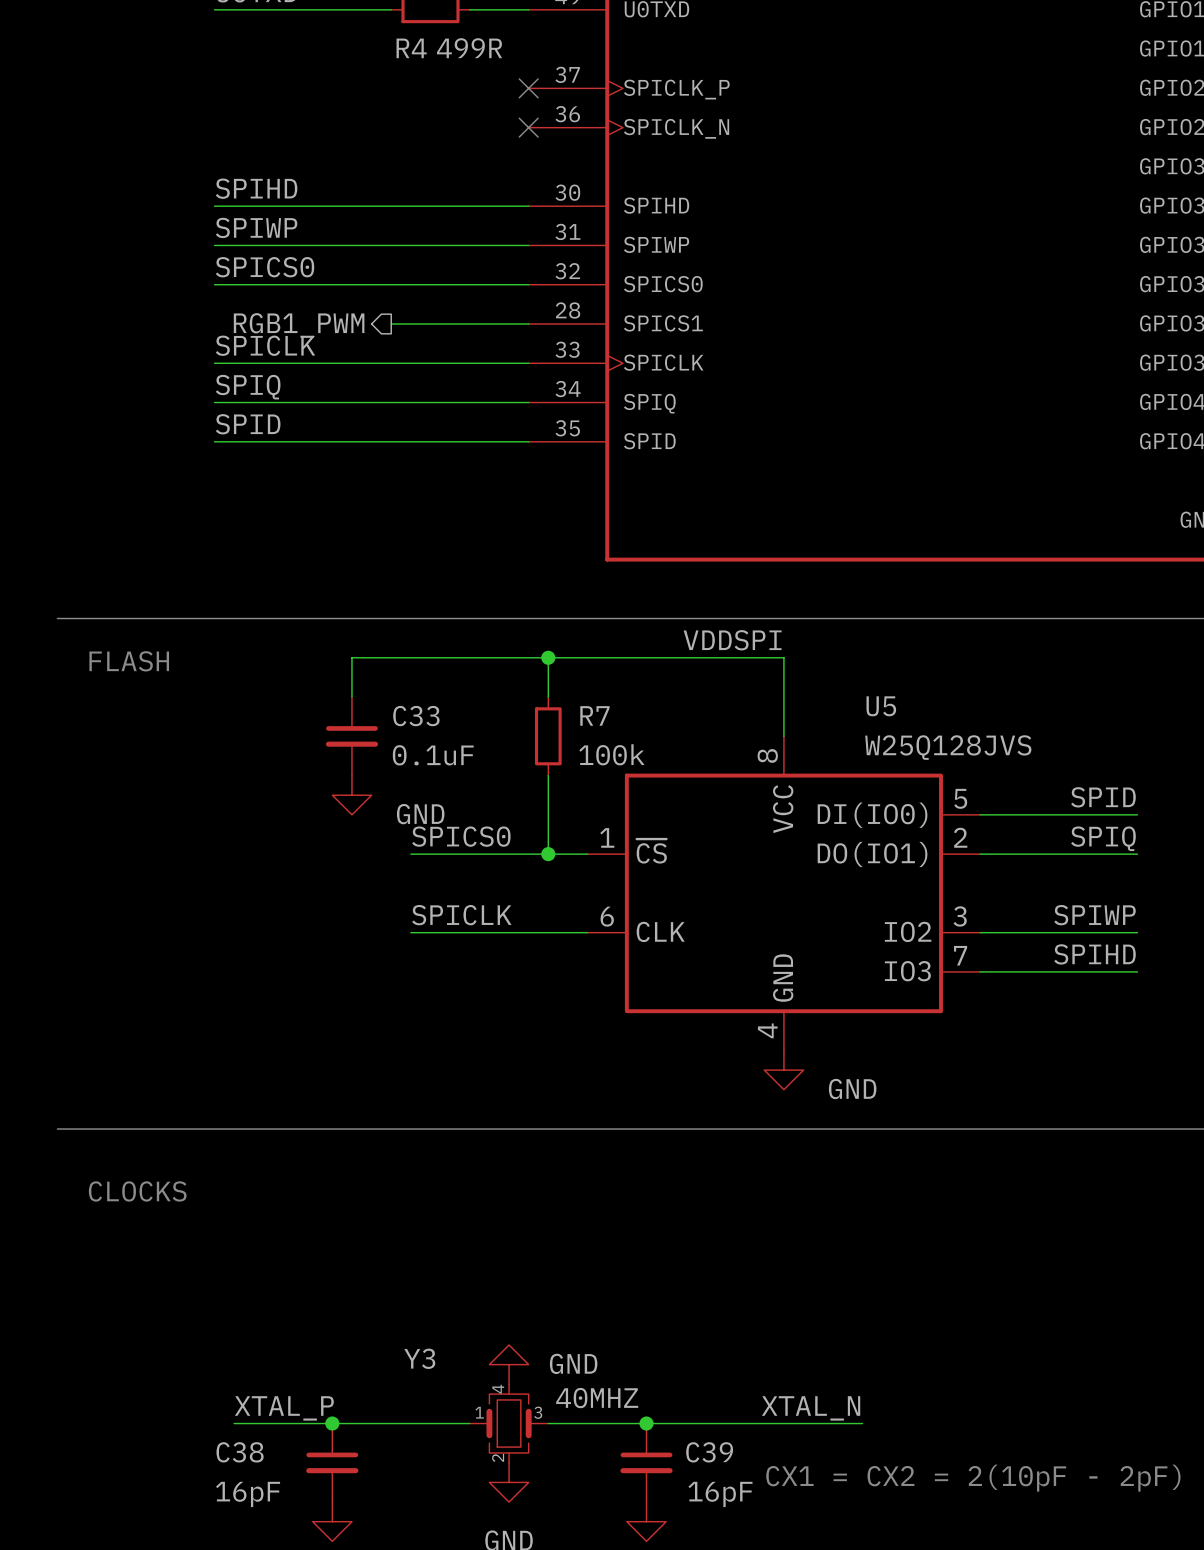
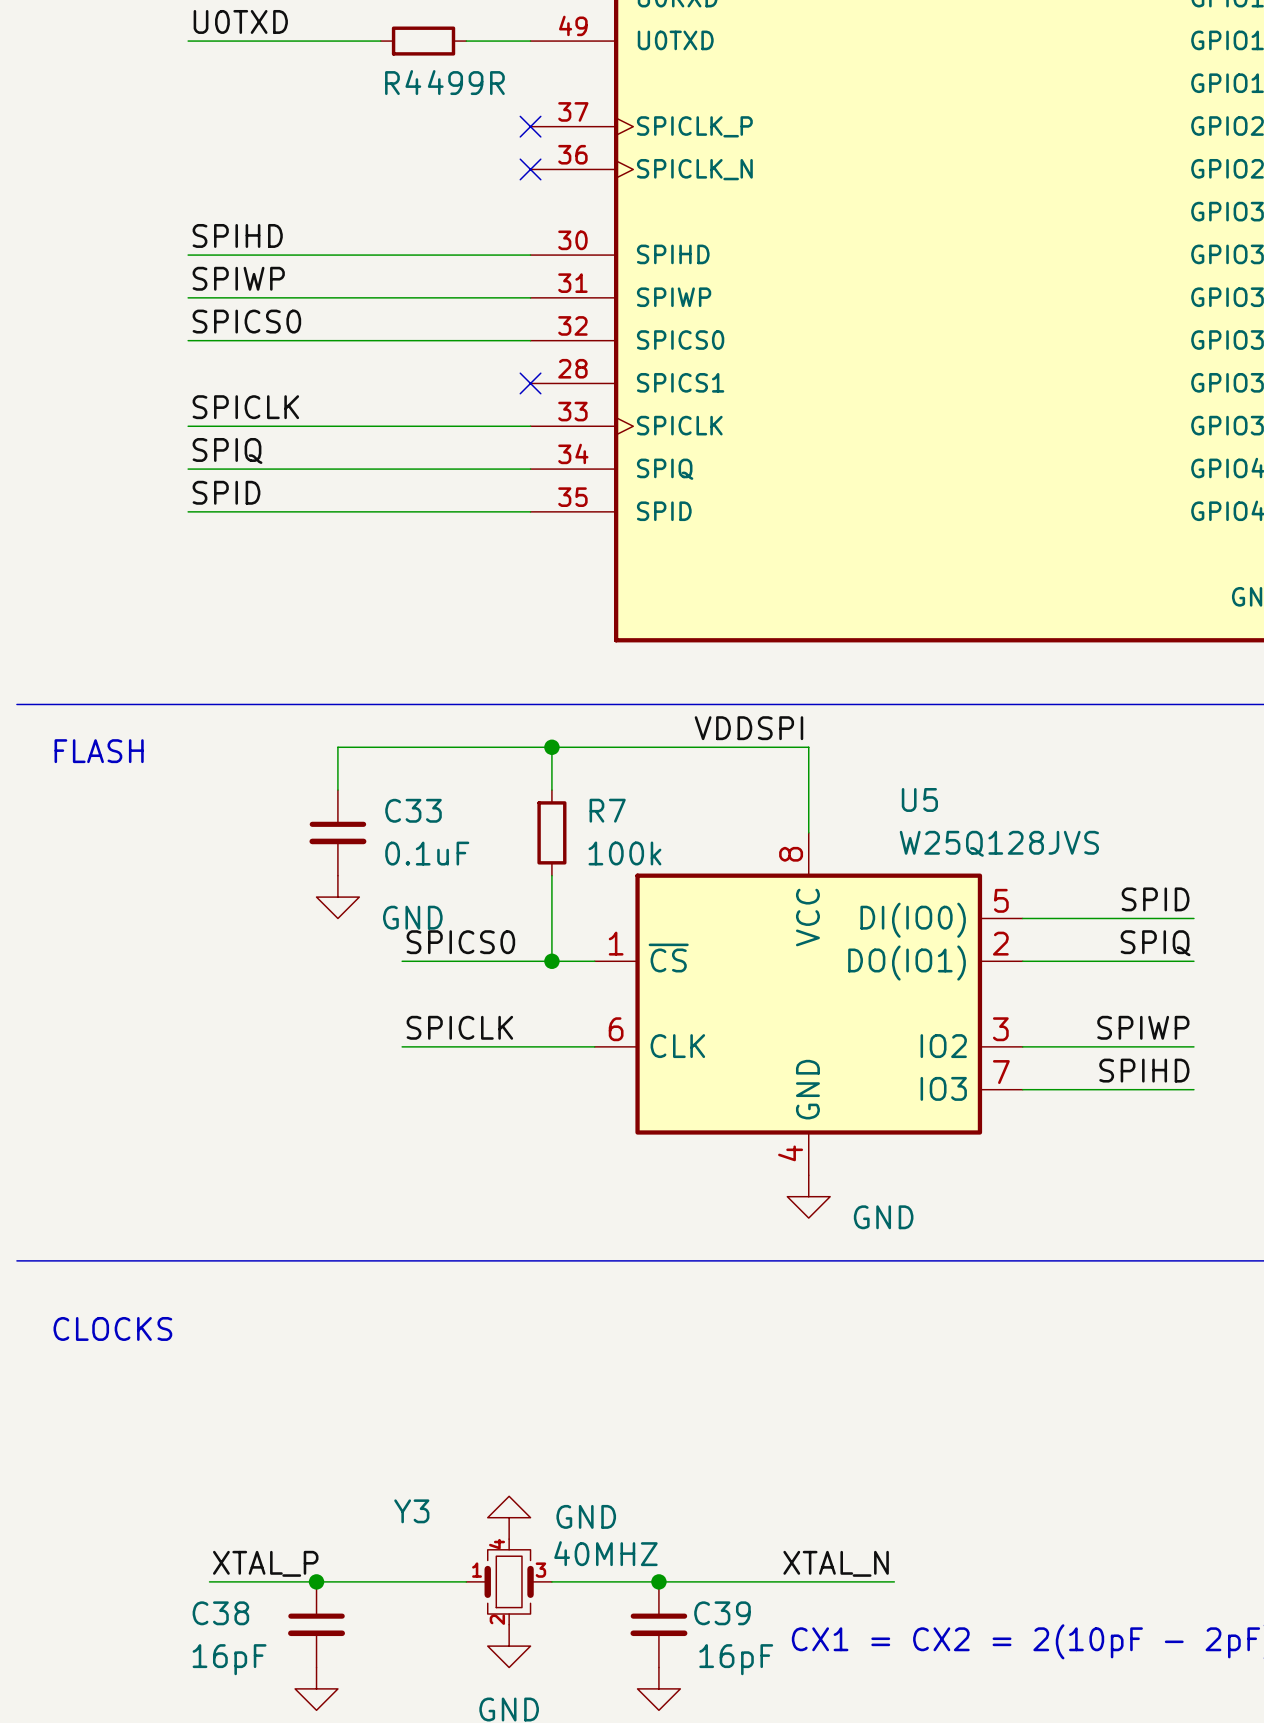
wire: (391, 323) (528, 323) -> none
no-connect mark: none -> (530, 383)
hierarchical label: RGB1_PWM (299, 325) -> none

